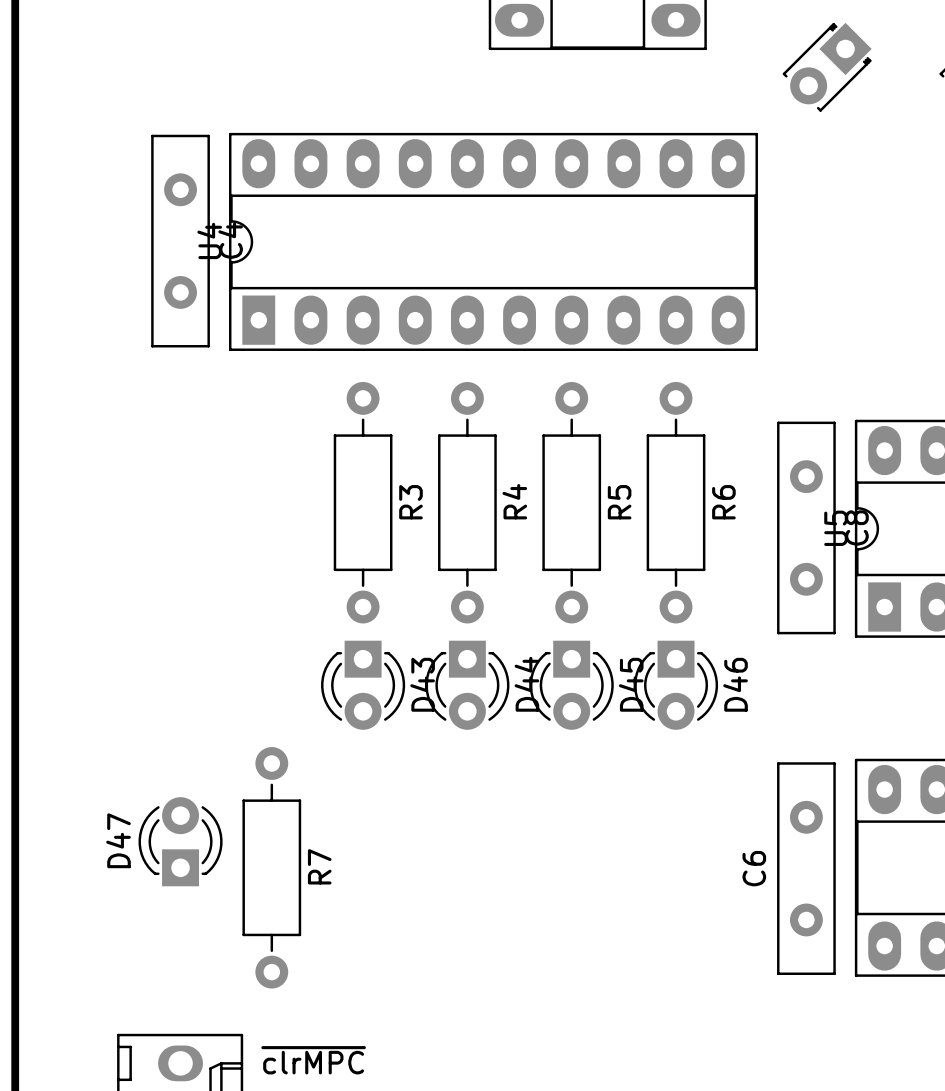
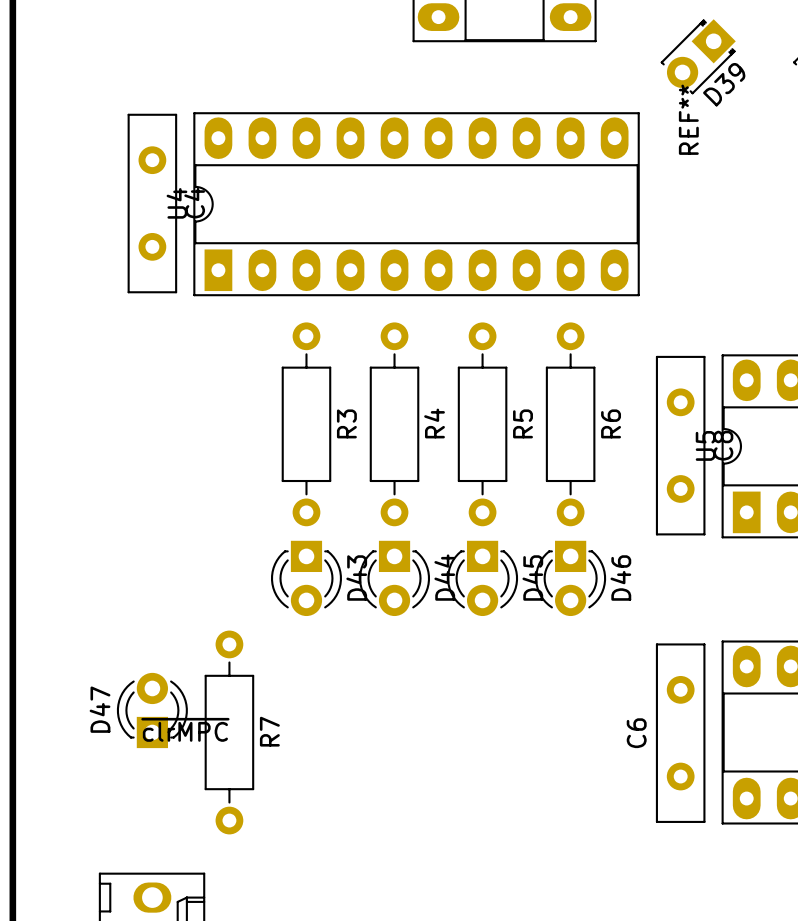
D39 name: none -> D39 (724, 84)
REF** name: none -> REF** (688, 119)
text position: ~{clrMPC} (313, 1060) -> ~{clrMPC} (185, 729)

